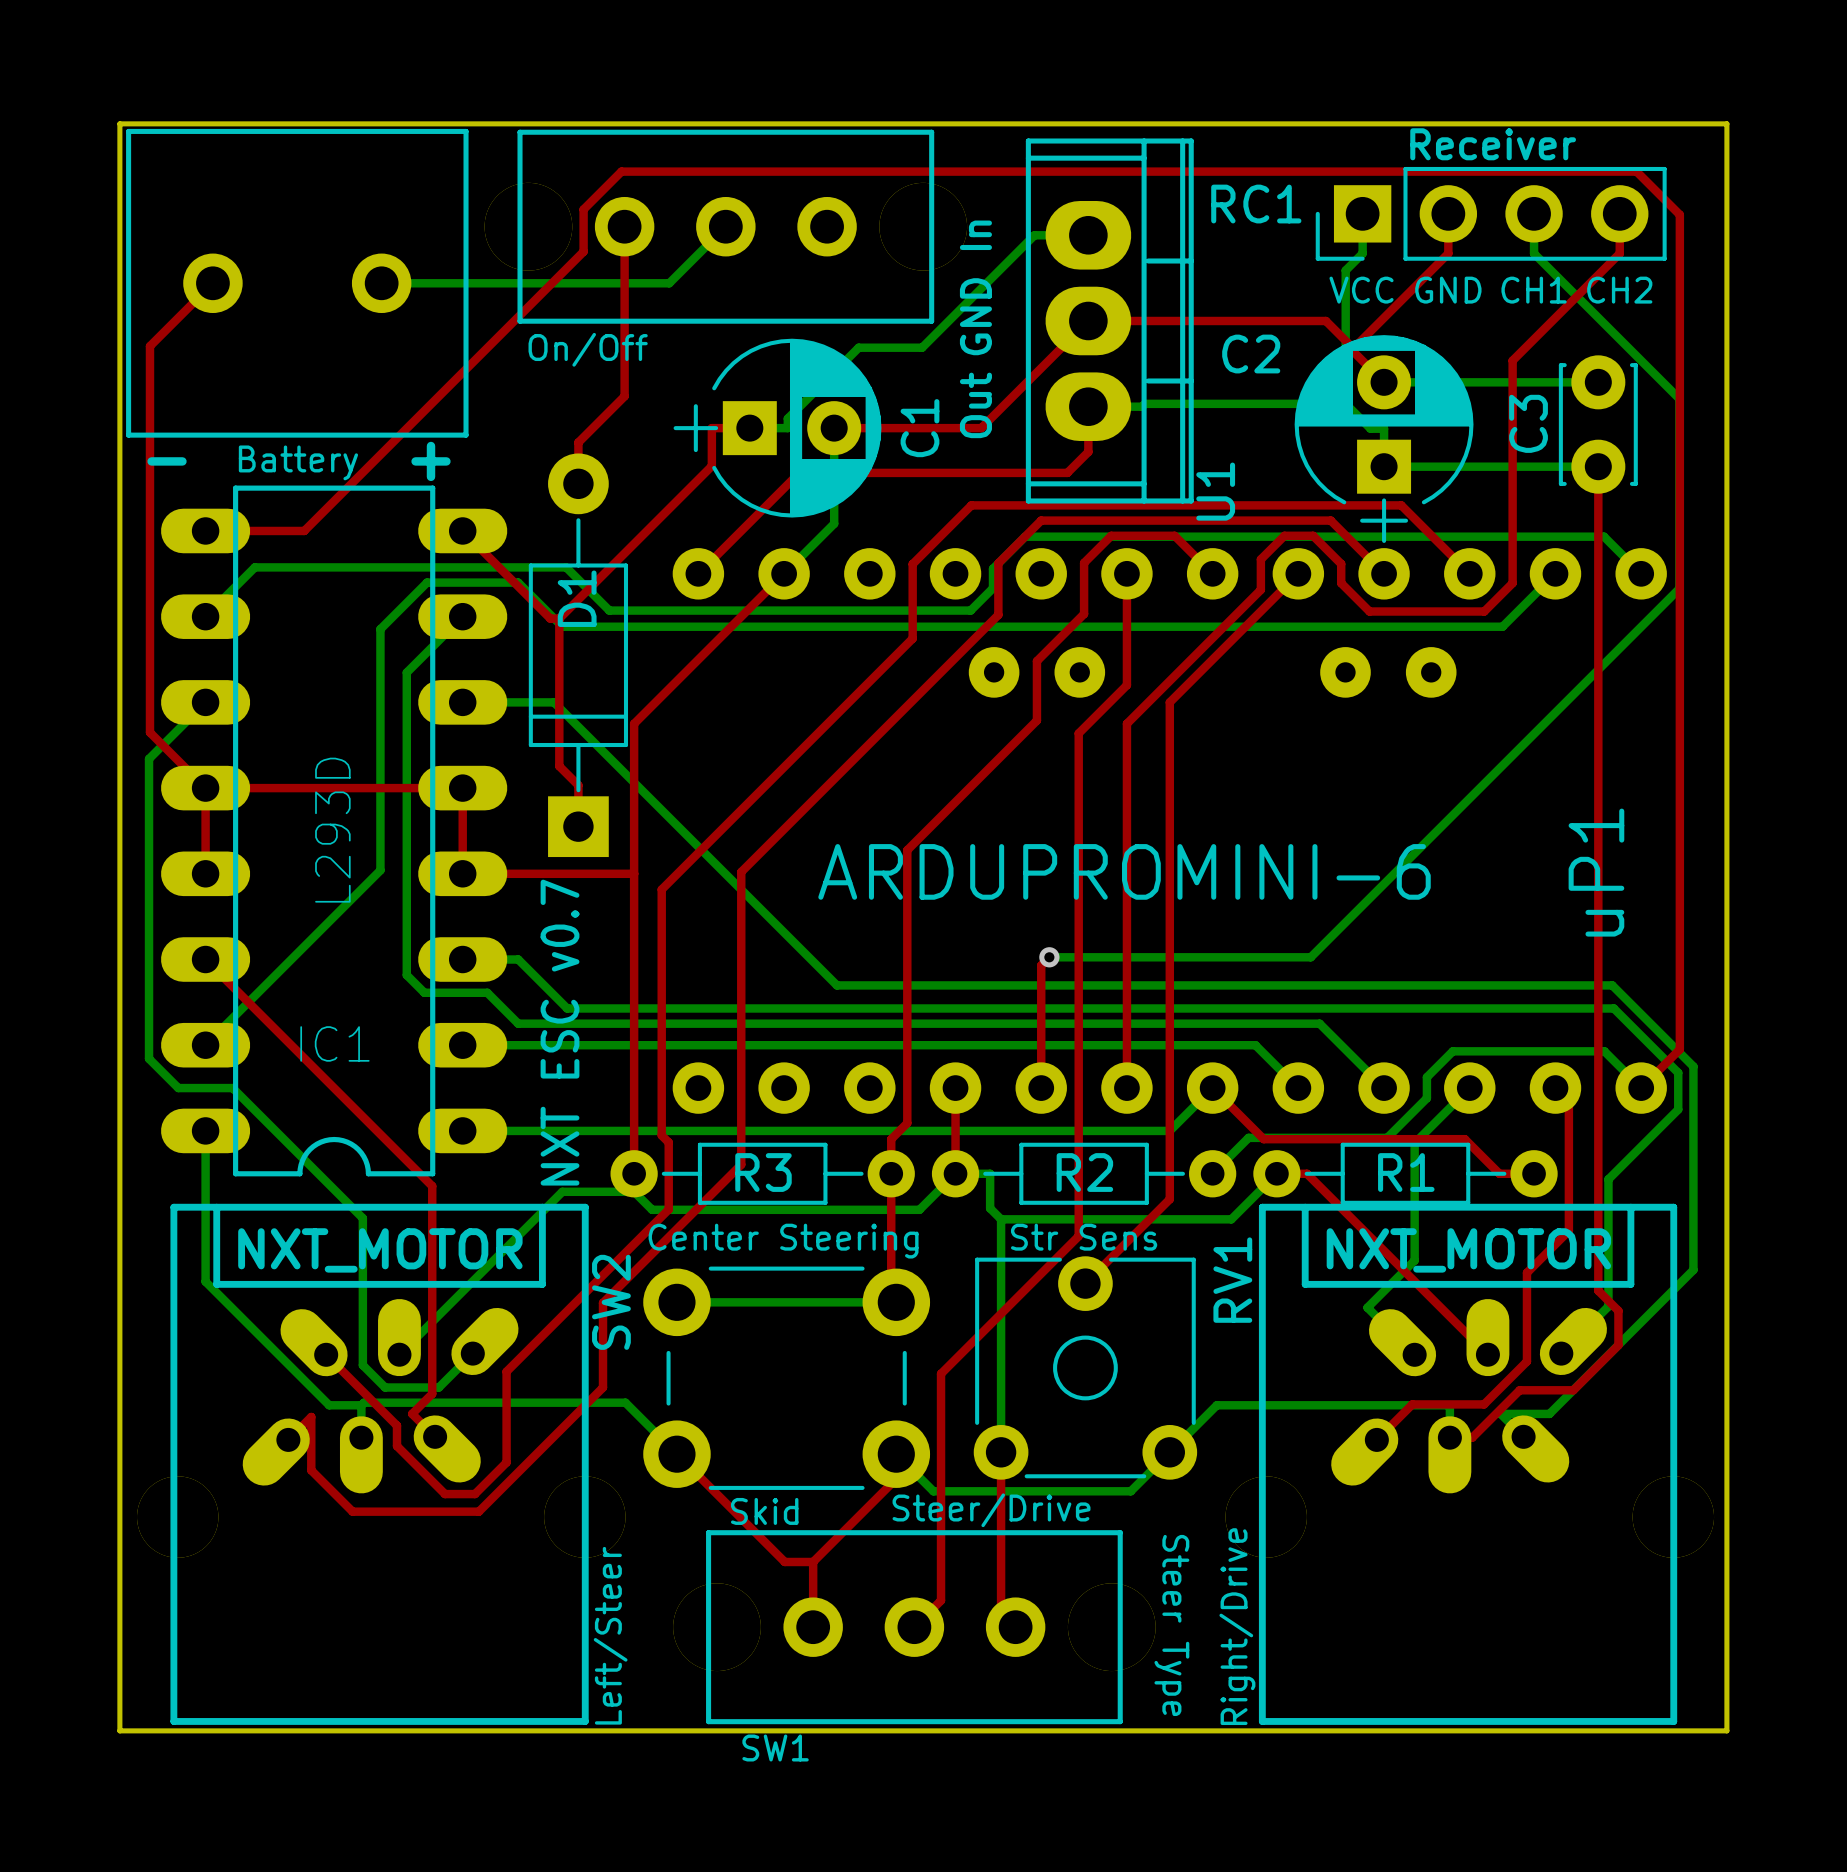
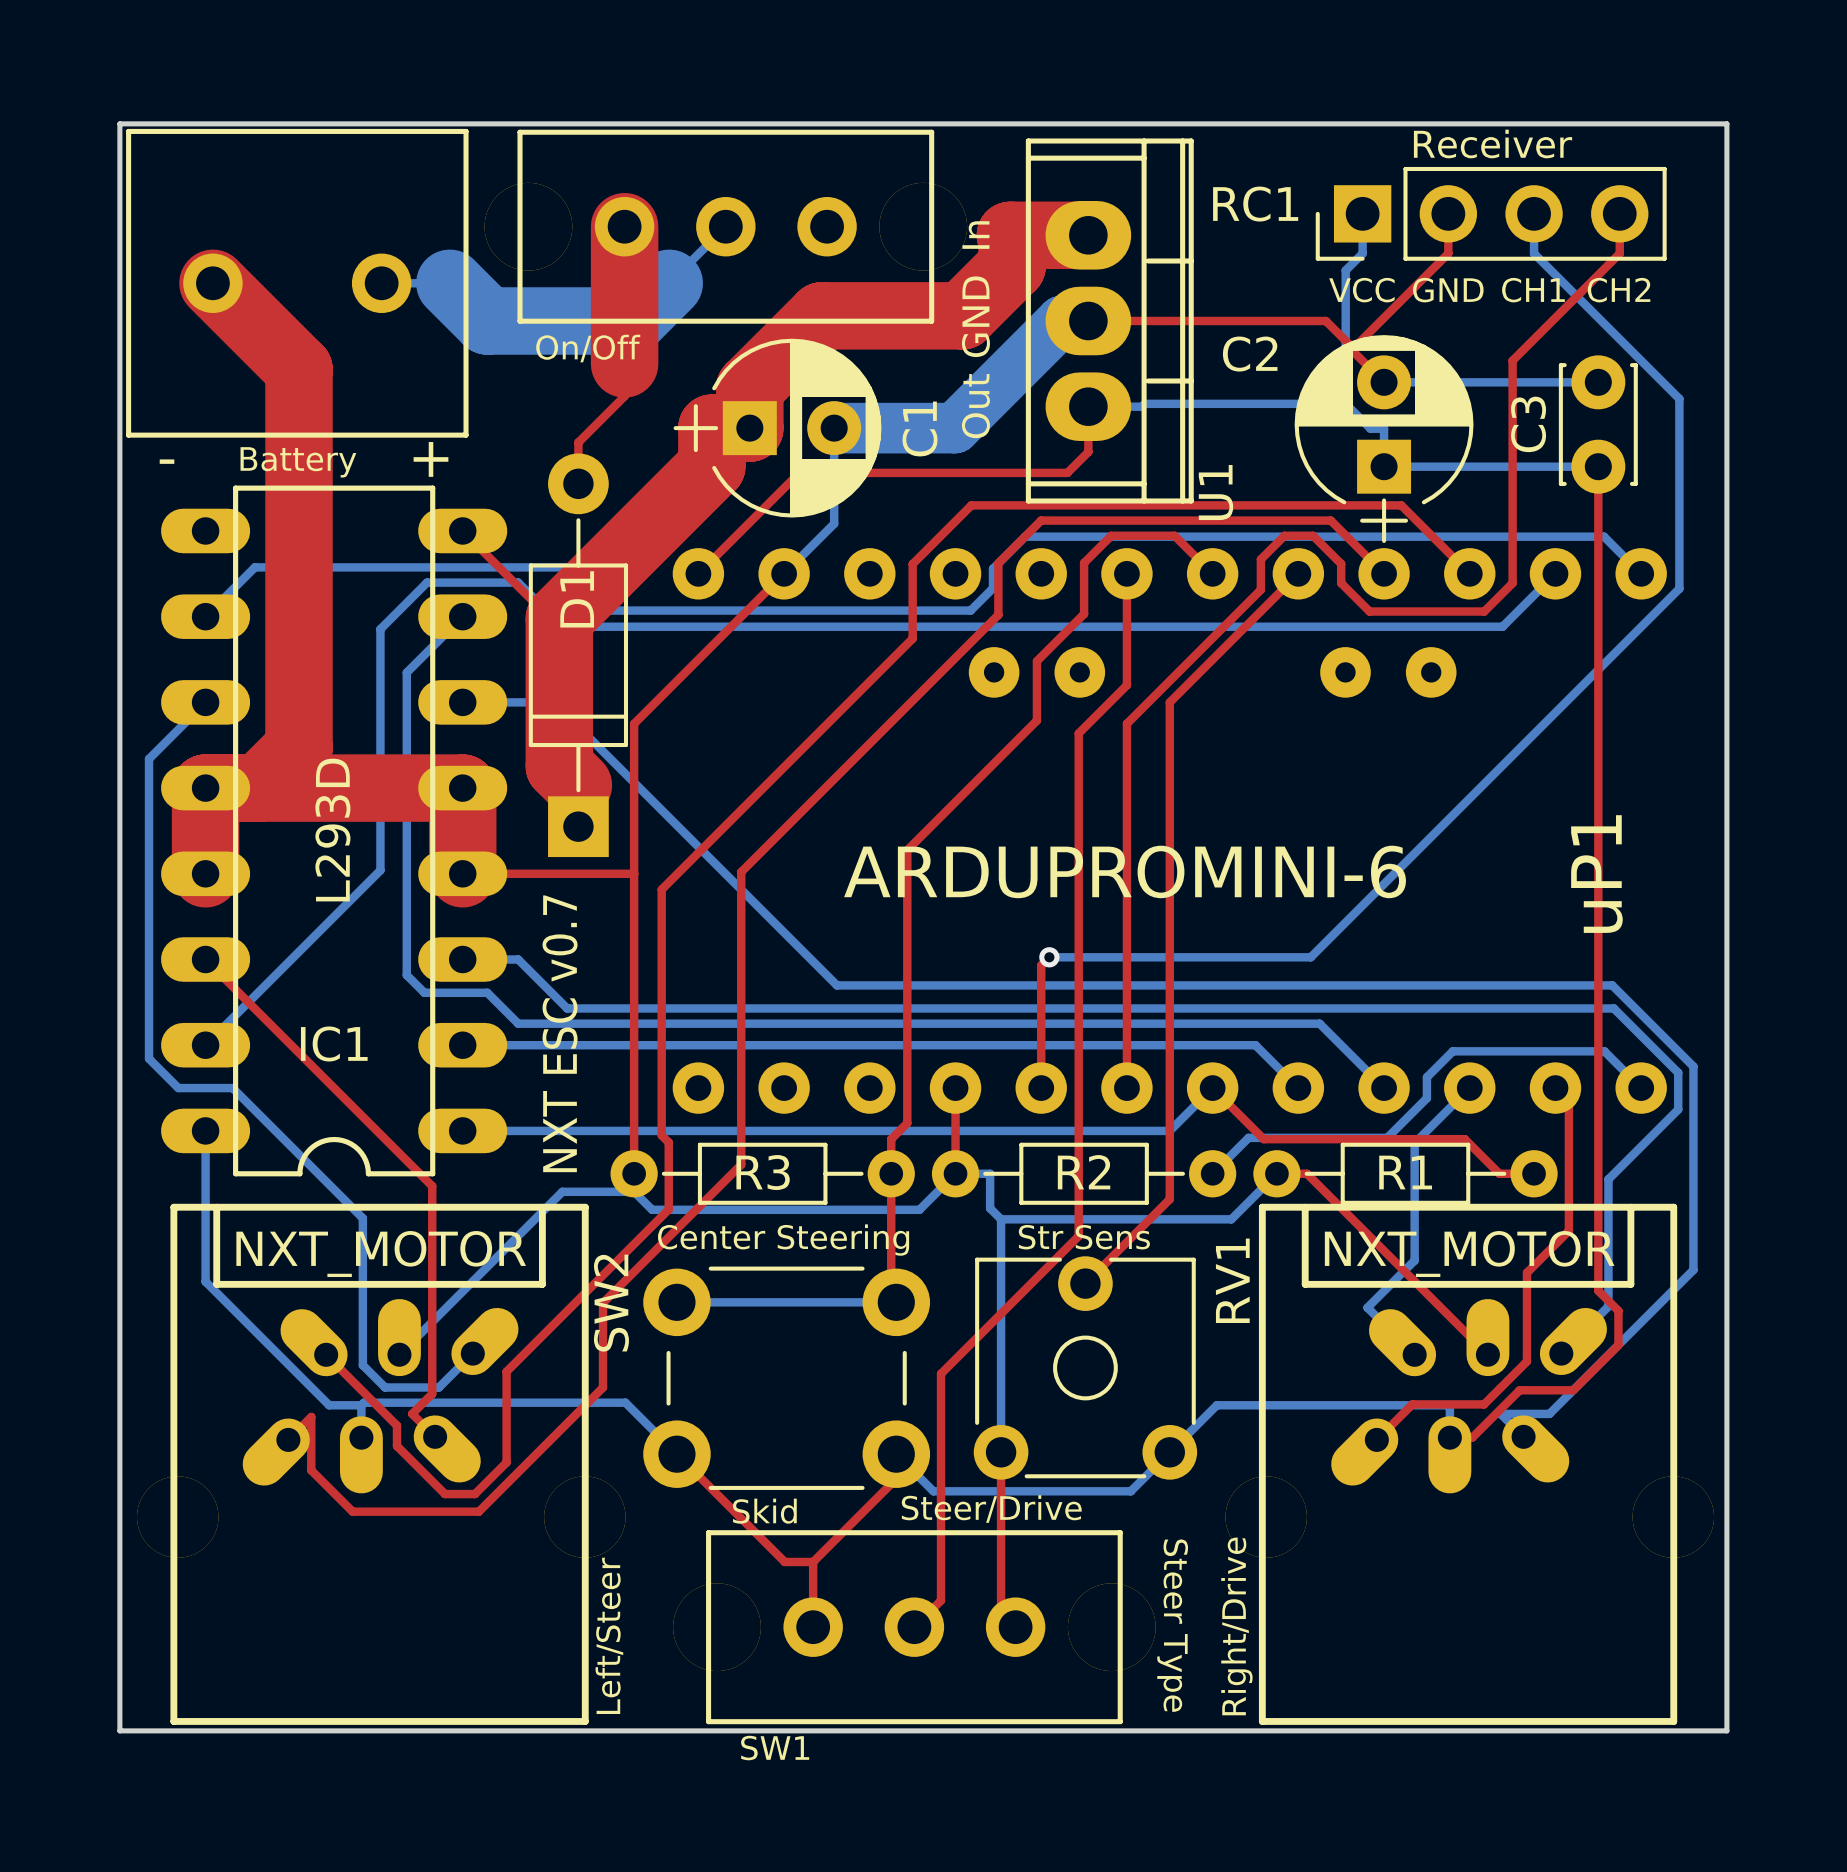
top track width: thin (624, 226) (624, 363) -> thick (624, 226) (624, 363)
bottom track: (1088, 235) (1034, 235) (922, 347) (858, 347) (787, 418) (787, 428) (749, 428) -> none
top track: none -> (1088, 235) (1010, 235) (1012, 237) (1012, 266) (962, 315) (821, 315) (749, 387) (749, 428)
top track: (212, 283) (149, 346) (149, 732) (205, 788) -> (212, 283) (299, 369) (299, 747) (258, 788)
bottom track: (449, 283) (669, 283) -> (449, 283) (487, 320) (631, 320) (669, 283)
bottom track: none -> (1088, 320) (1061, 320) (954, 428) (834, 428)
top track: (1088, 320) (981, 428) (834, 428) -> none
top track width: thin (749, 428) (711, 428) (711, 466) (559, 618) (559, 766) (578, 785) -> thick (749, 428) (711, 428) (711, 466) (559, 618) (559, 766) (578, 785)
top track: (205, 530) (304, 530) (583, 251) (583, 209) (621, 171) (1636, 171) (1679, 214) (1679, 1049) (1641, 1088) -> none
top track width: thin (205, 873) (205, 788) (462, 788) (462, 873) -> thick (205, 873) (205, 788) (462, 788) (462, 873)

